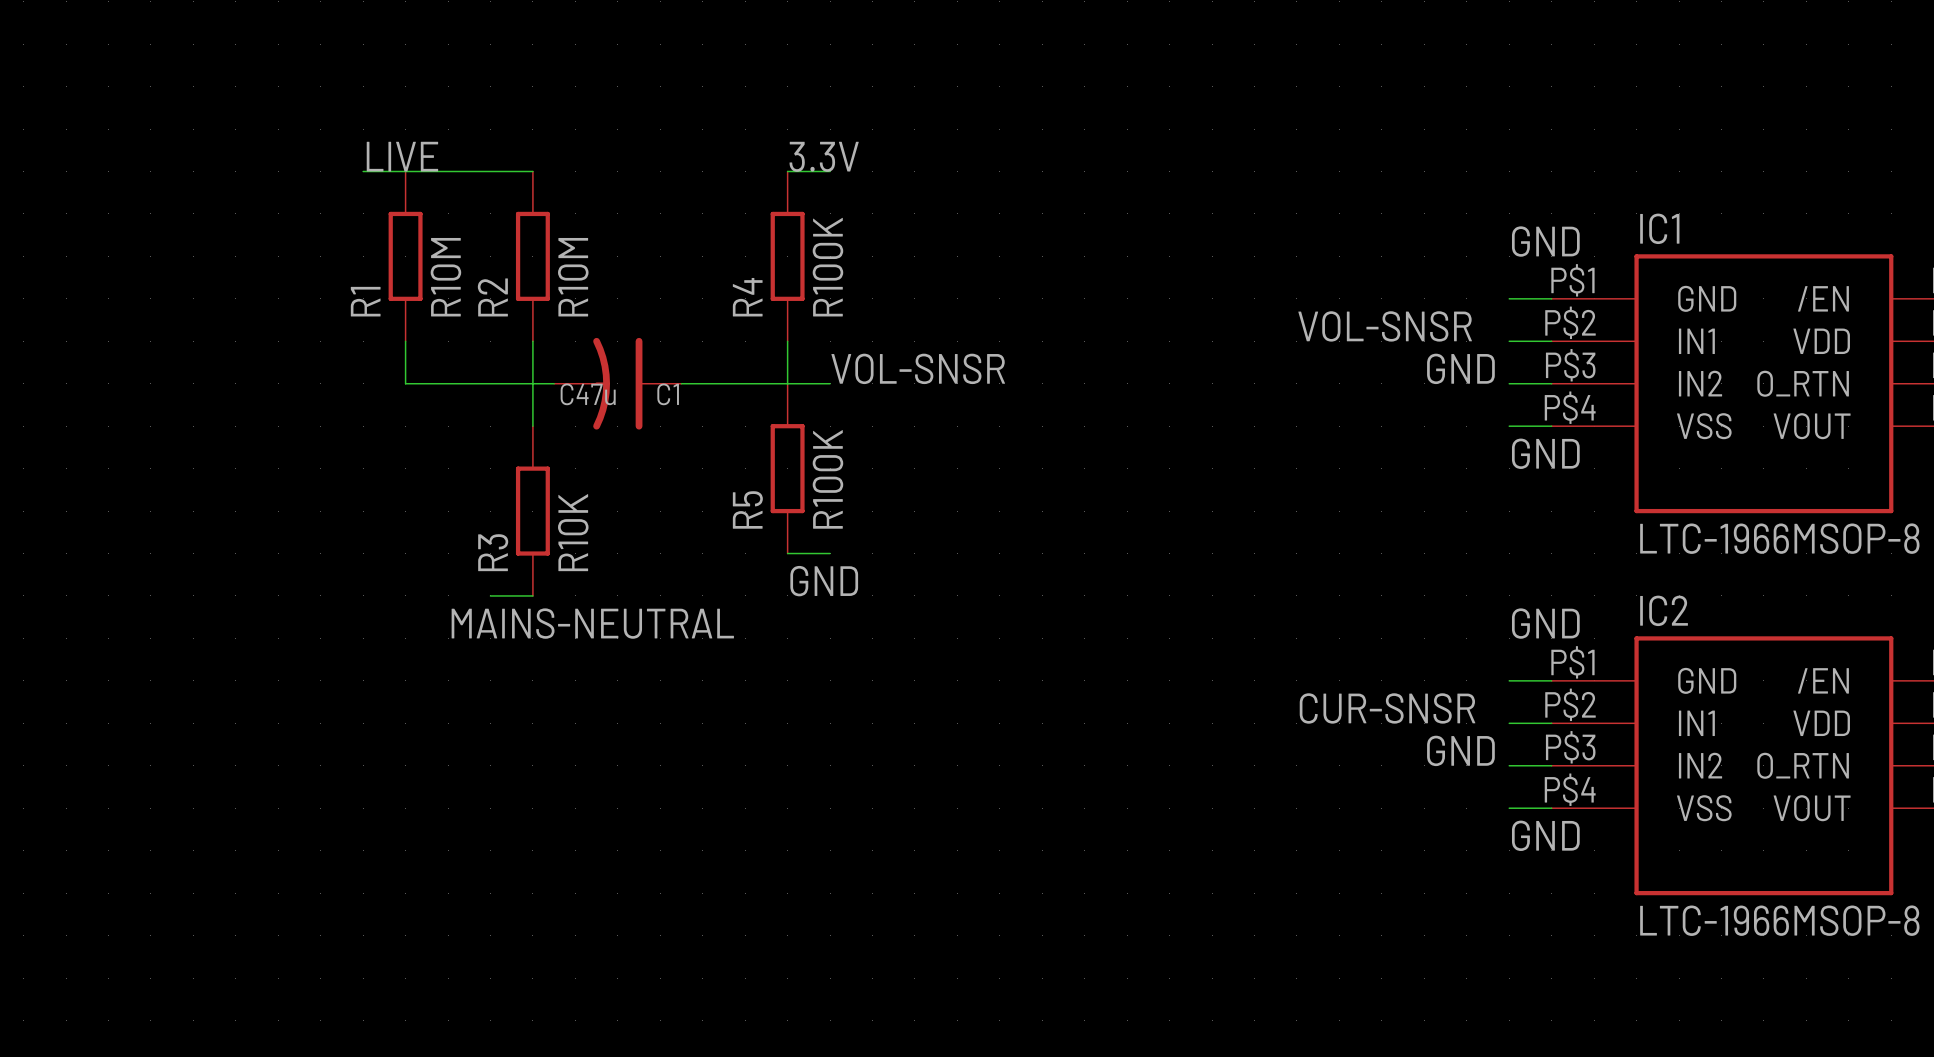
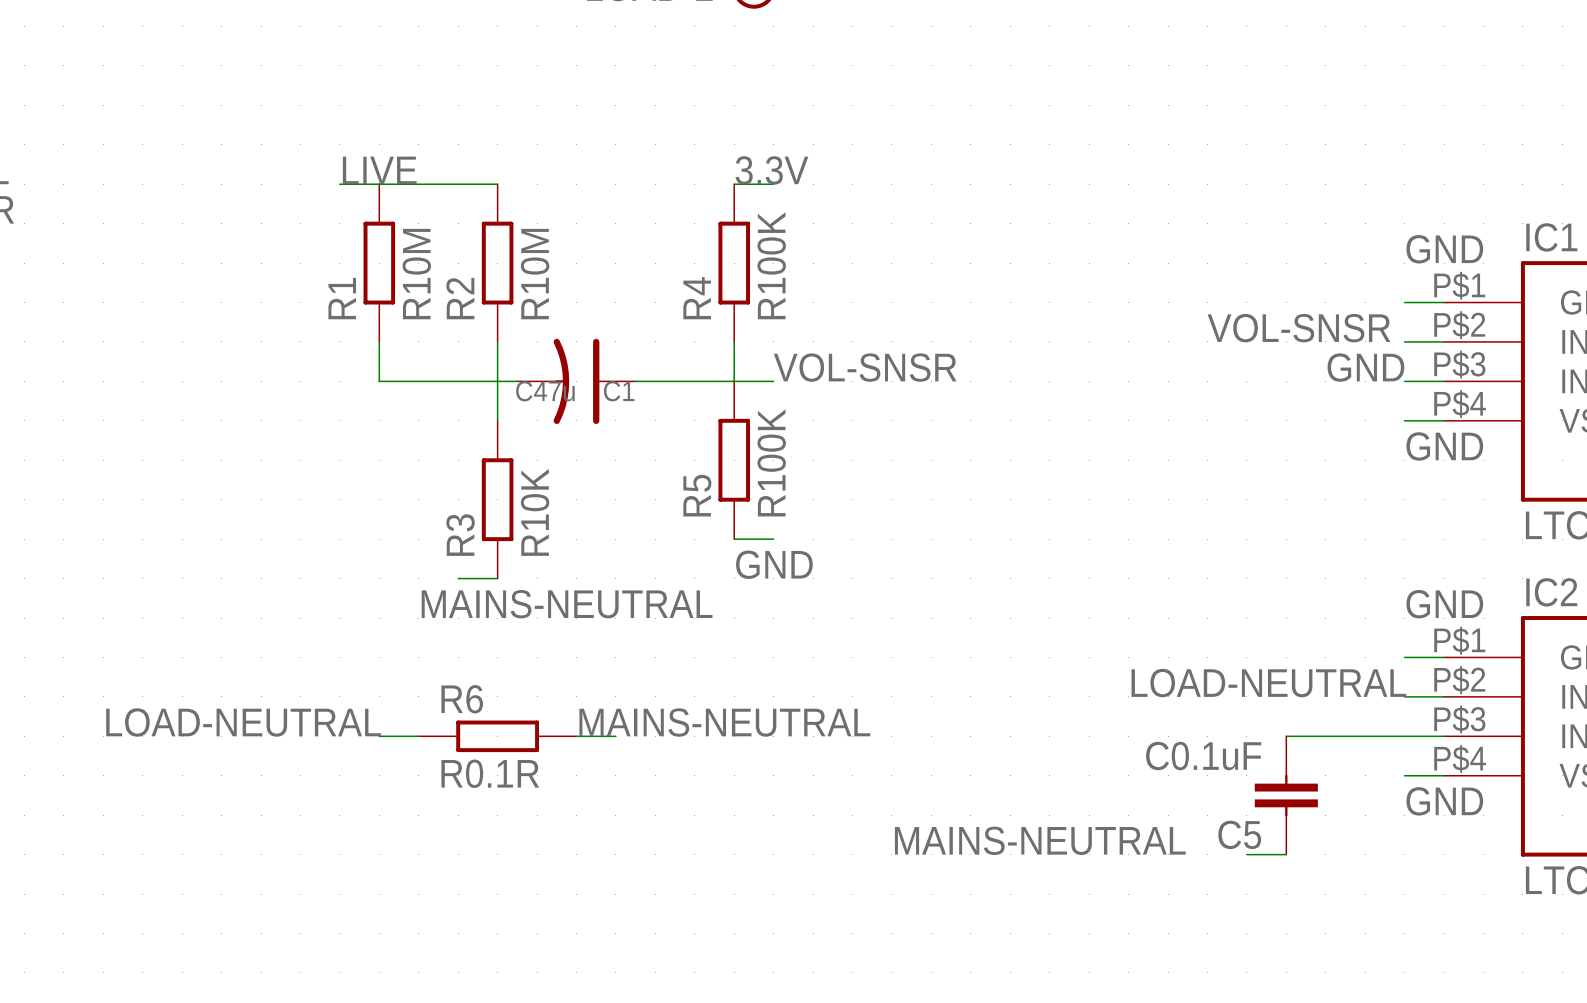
label: none -> LOAD-NEUTRAL (1268, 683)
label: CUR-SNSR (1387, 708) -> none
label: none -> LOAD-NEUTRAL (243, 722)
label: none -> MAINS-NEUTRAL (724, 722)
label: GND (1460, 750) -> none
wire: none -> (379, 736) (418, 736)
R6: none -> R0.1R (497, 736)
wire: none -> (576, 736) (615, 736)
wire: none -> (1286, 736) (1404, 736)
C5: none -> C0.1uF (1286, 795)
label: none -> MAINS-NEUTRAL (1040, 840)
wire: none -> (1246, 854) (1286, 854)

